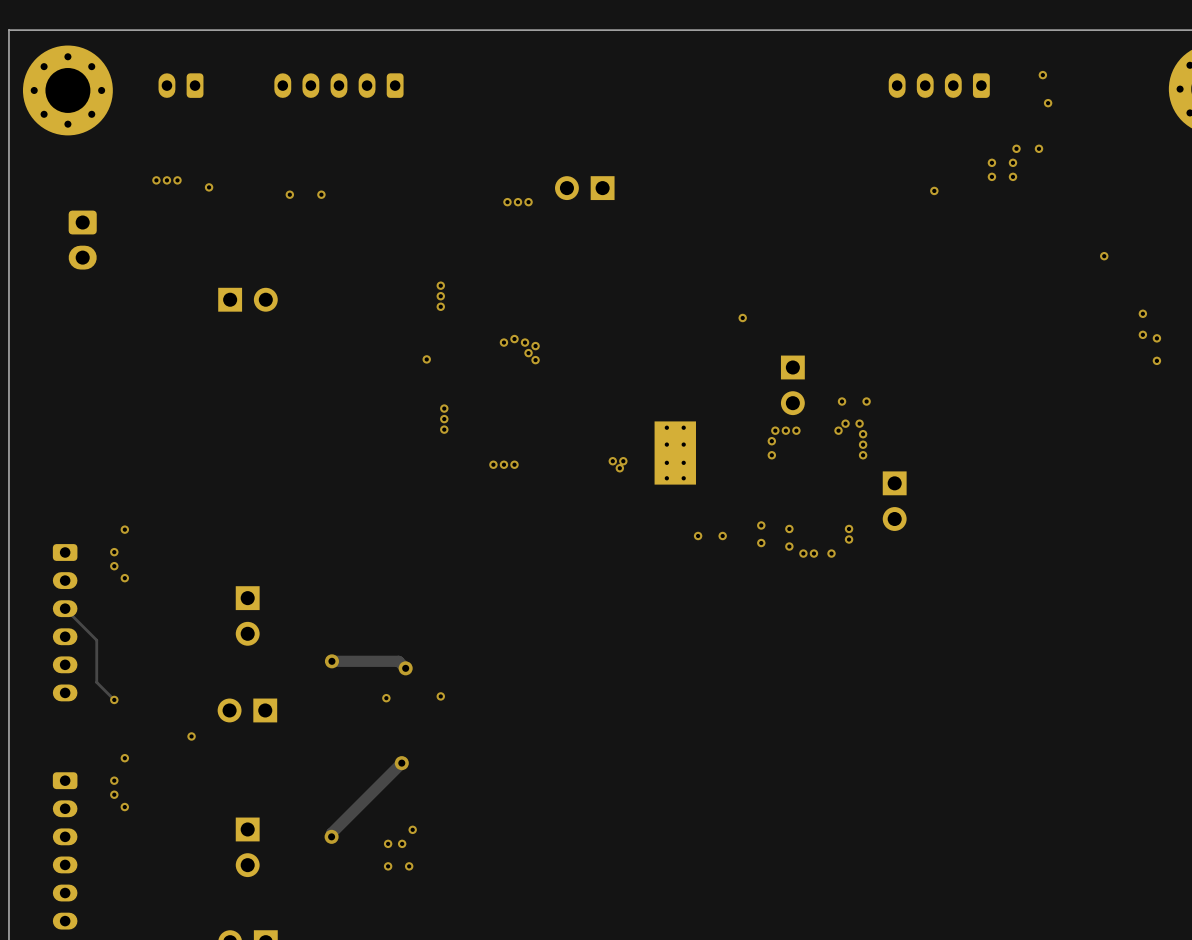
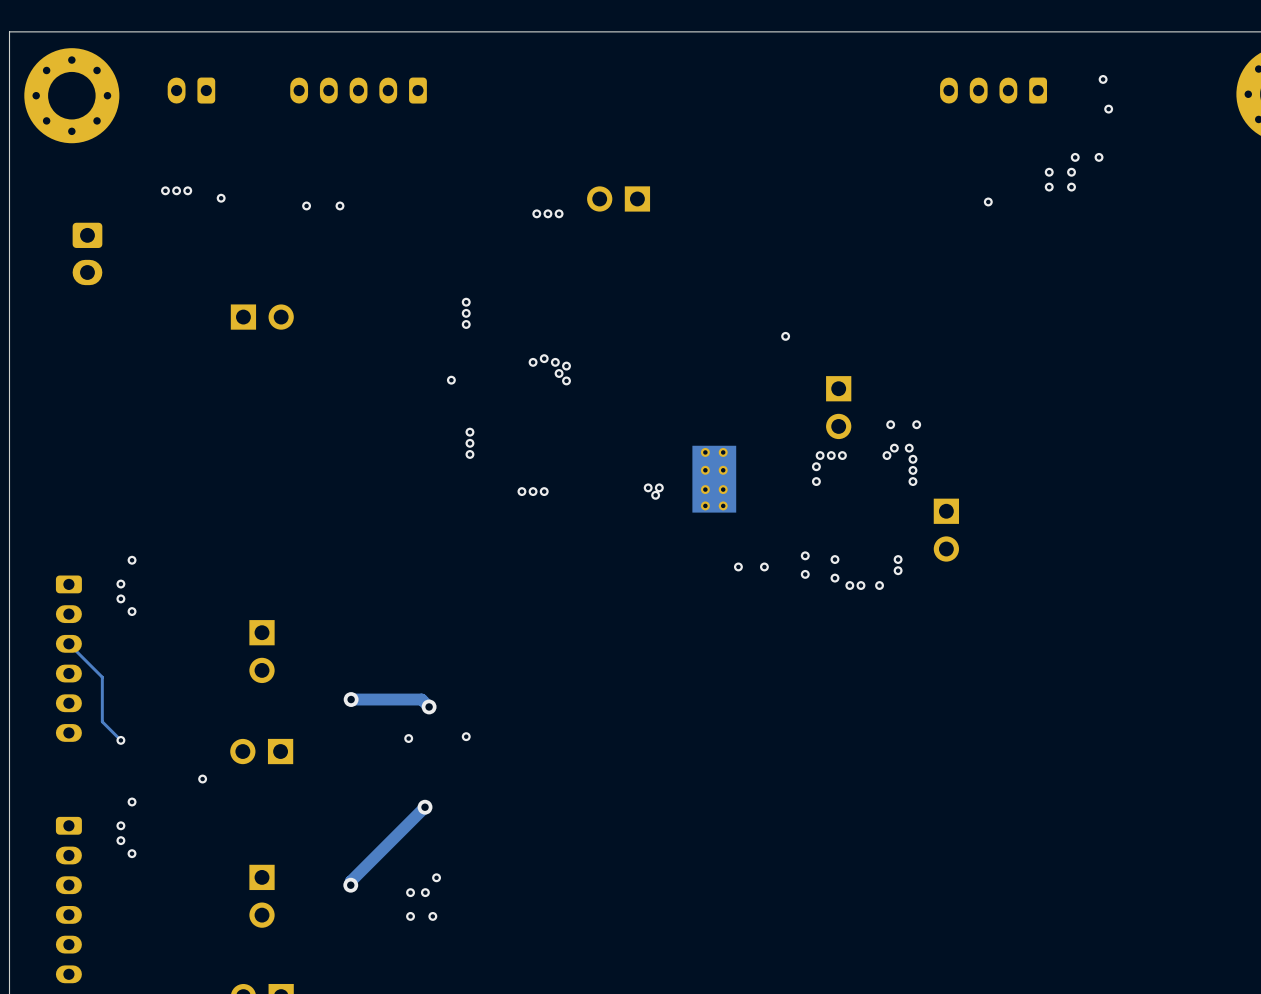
via: (1104, 256) -> none
via: (1142, 313) -> none
via: (1142, 334) -> none
via: (1156, 338) -> none
via: (1156, 360) -> none

